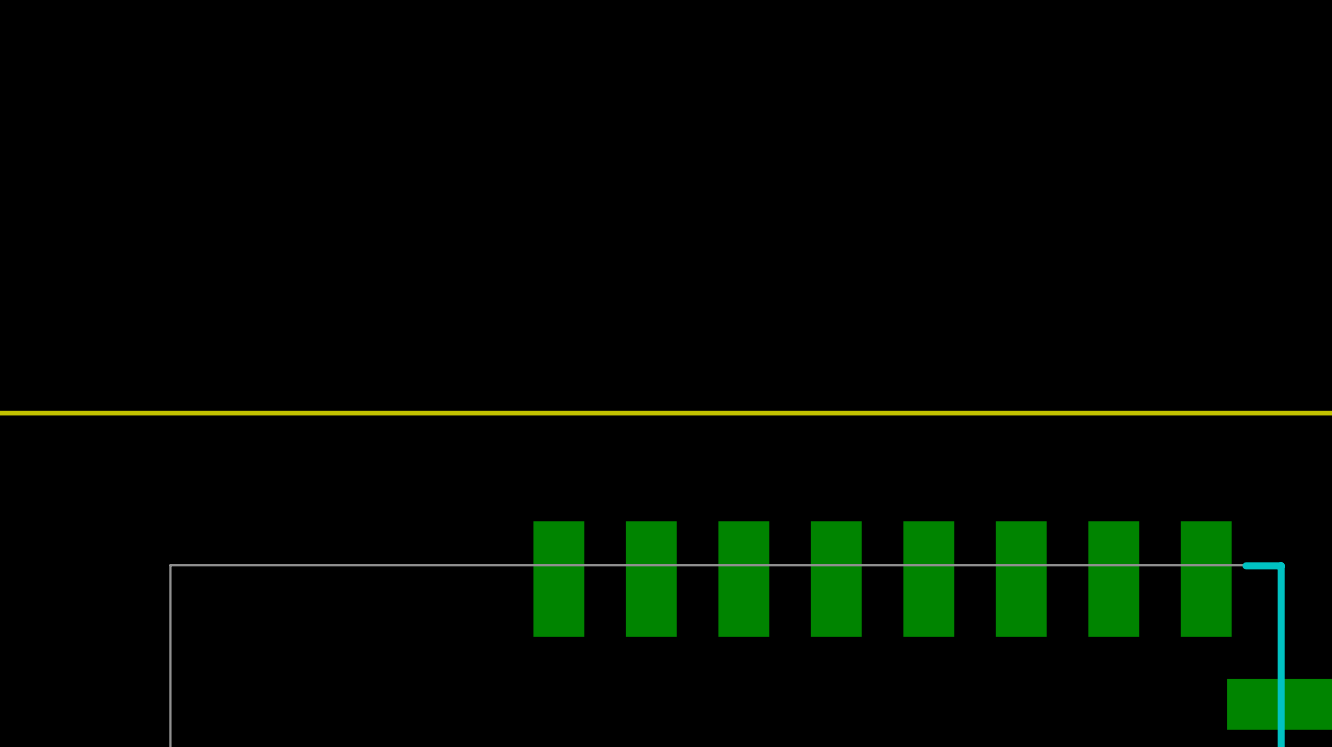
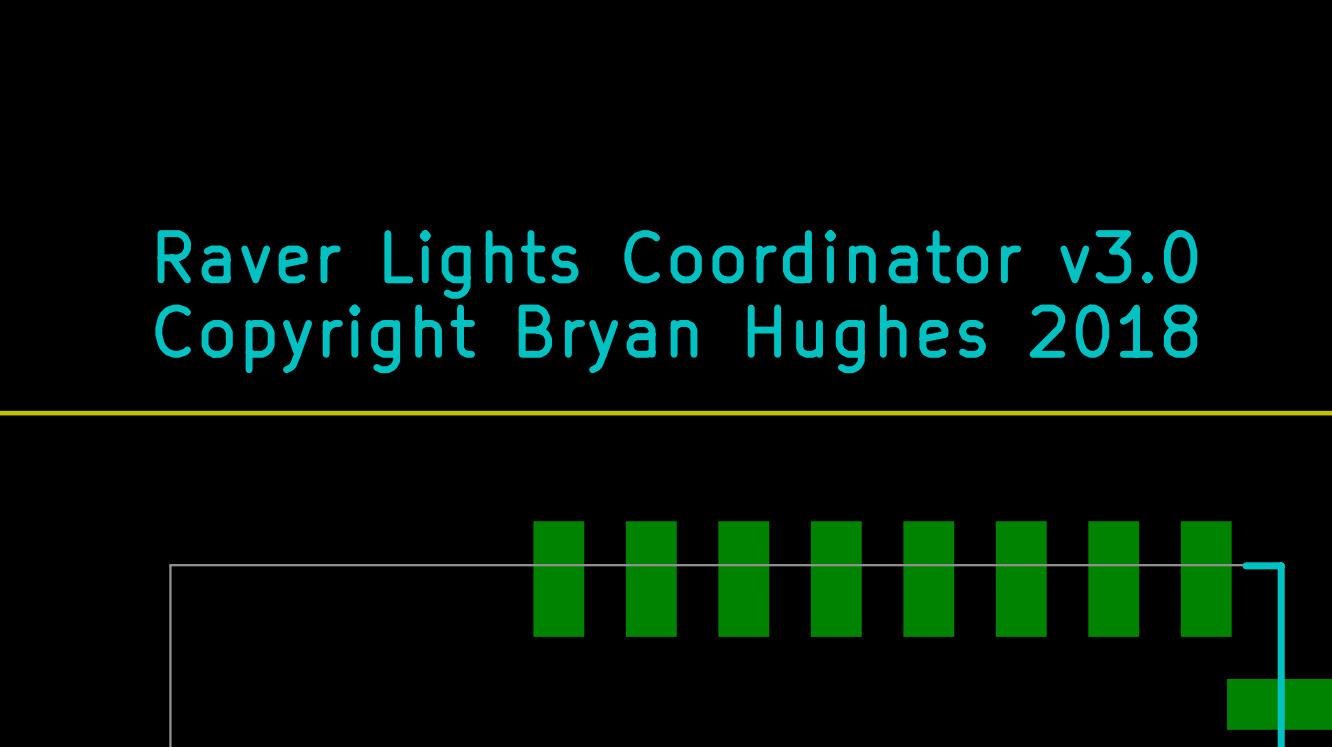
text: none -> Raver Lights Coordinator v3.0 (677, 264)
text: none -> Copyright Bryan Hughes 2018 (676, 338)

